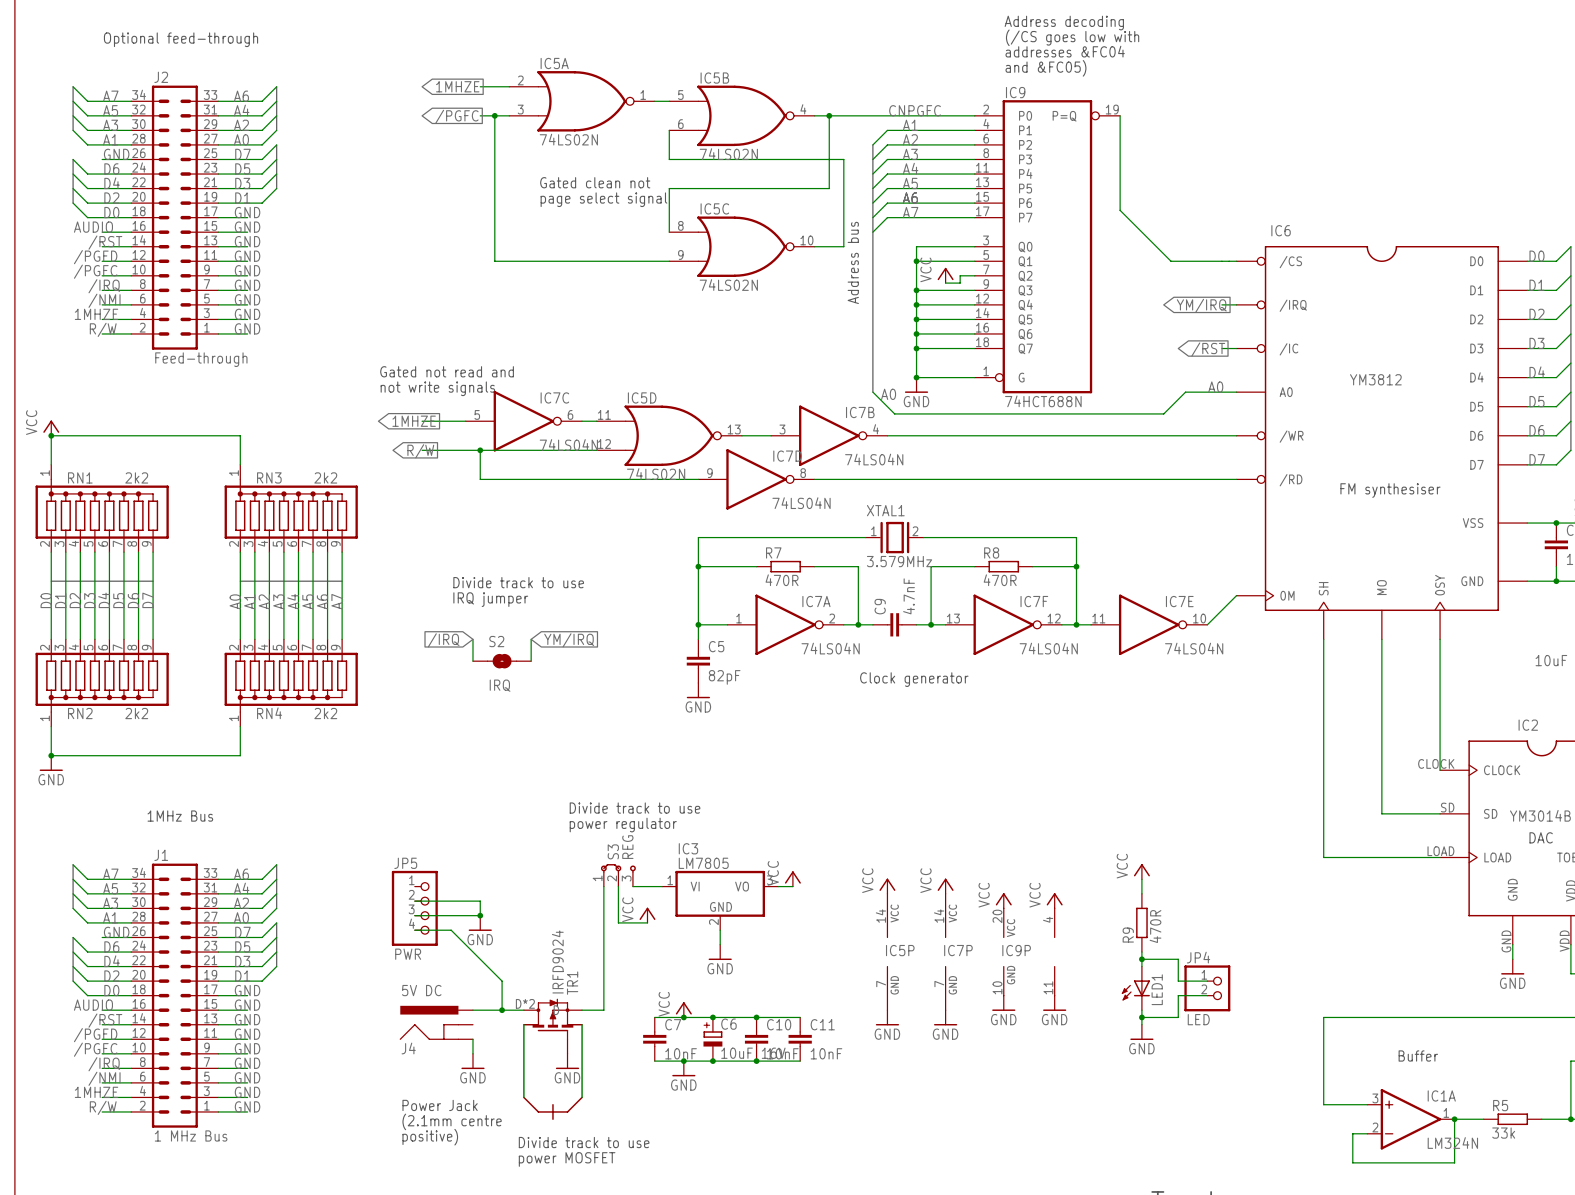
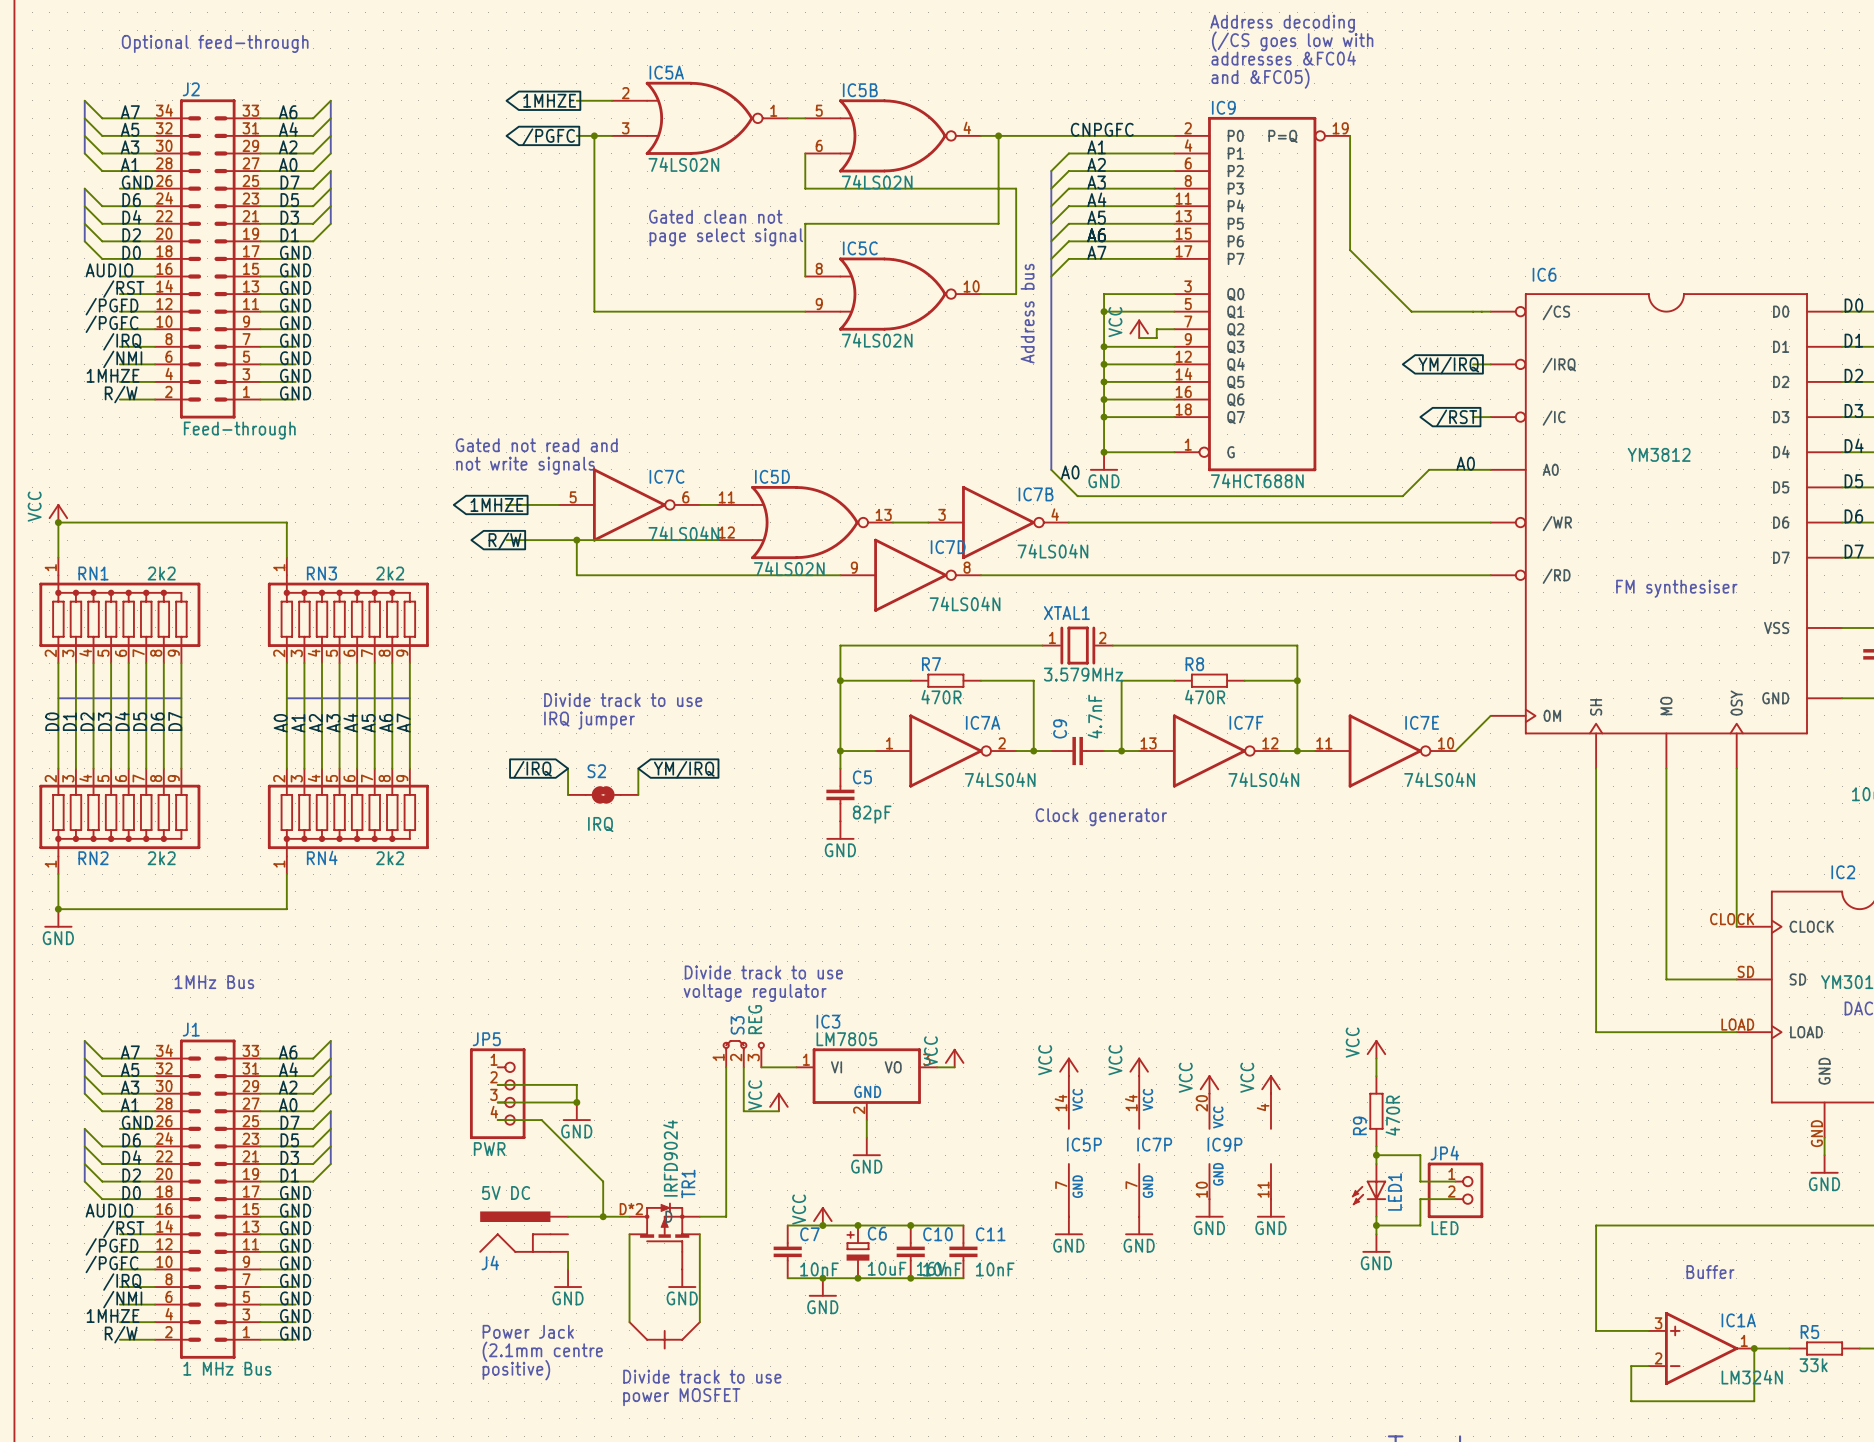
text: power regulator (623, 825) -> voltage regulator (755, 992)

